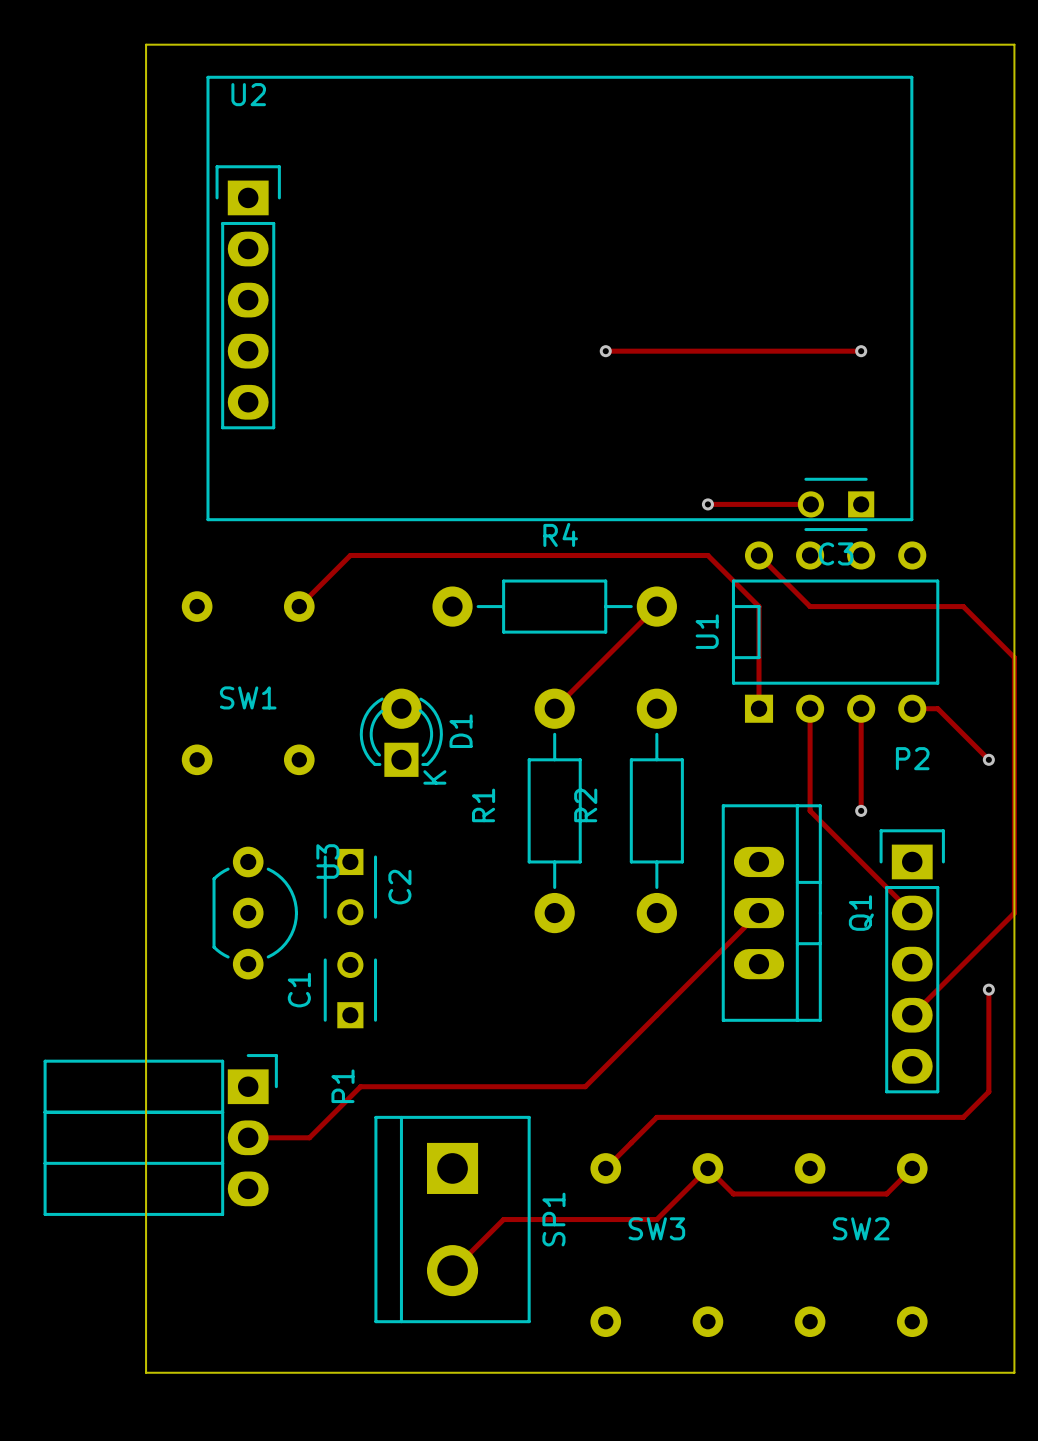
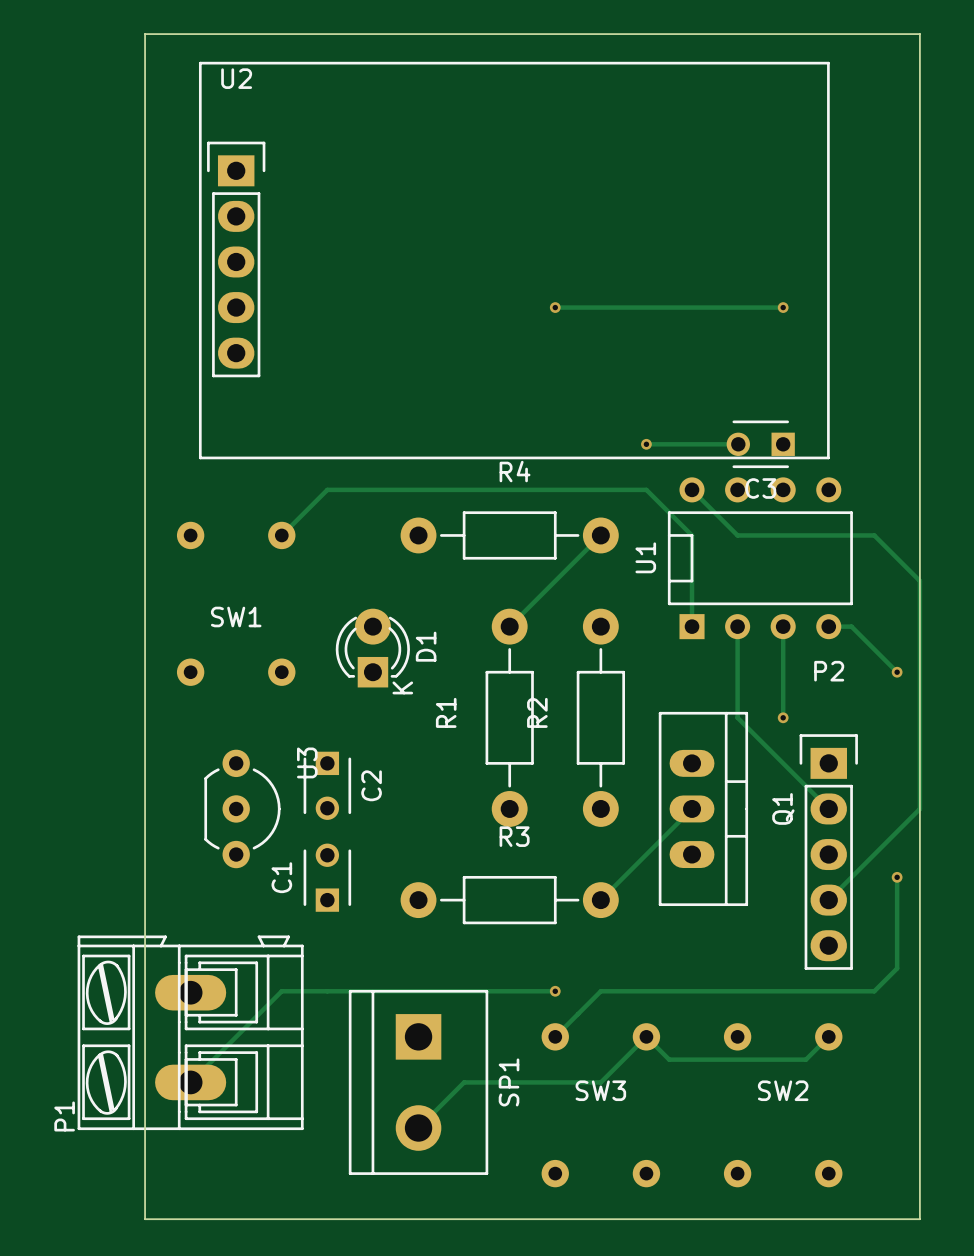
R3: none -> (509, 900)
track: (656, 1015) (585, 1086) (360, 1086) (309, 1137) (248, 1137) -> none
P1 footprint: [43, 1054, 278, 1216] -> [77, 935, 304, 1131]
P1 name position: P1 (342, 1086) -> P1 (64, 1116)
track: none -> (555, 991) (281, 991) (190, 1082)
via: none -> (555, 991)

